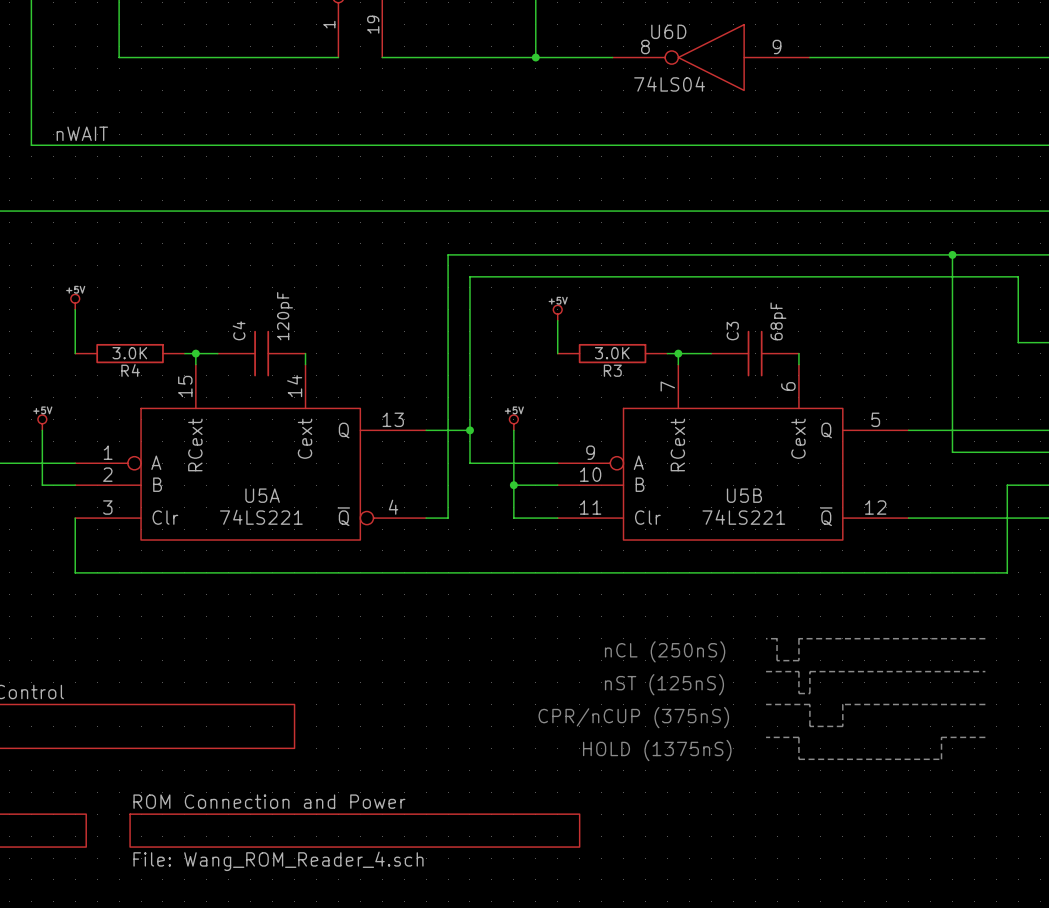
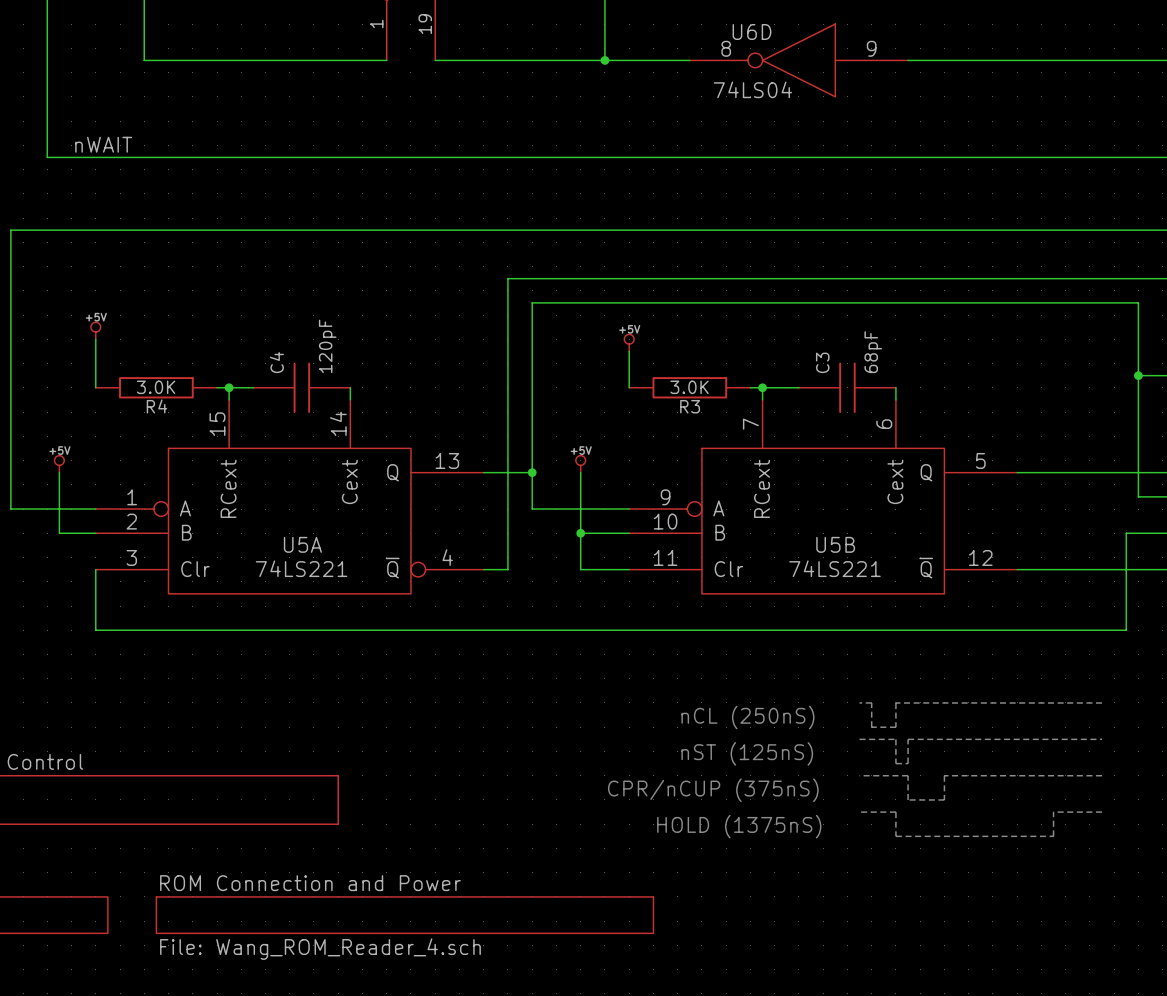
wire: (952, 254) (952, 452) (1018, 452) -> (1138, 375) (1138, 496)
junction: (952, 254) -> none
junction: none -> (1138, 375)

